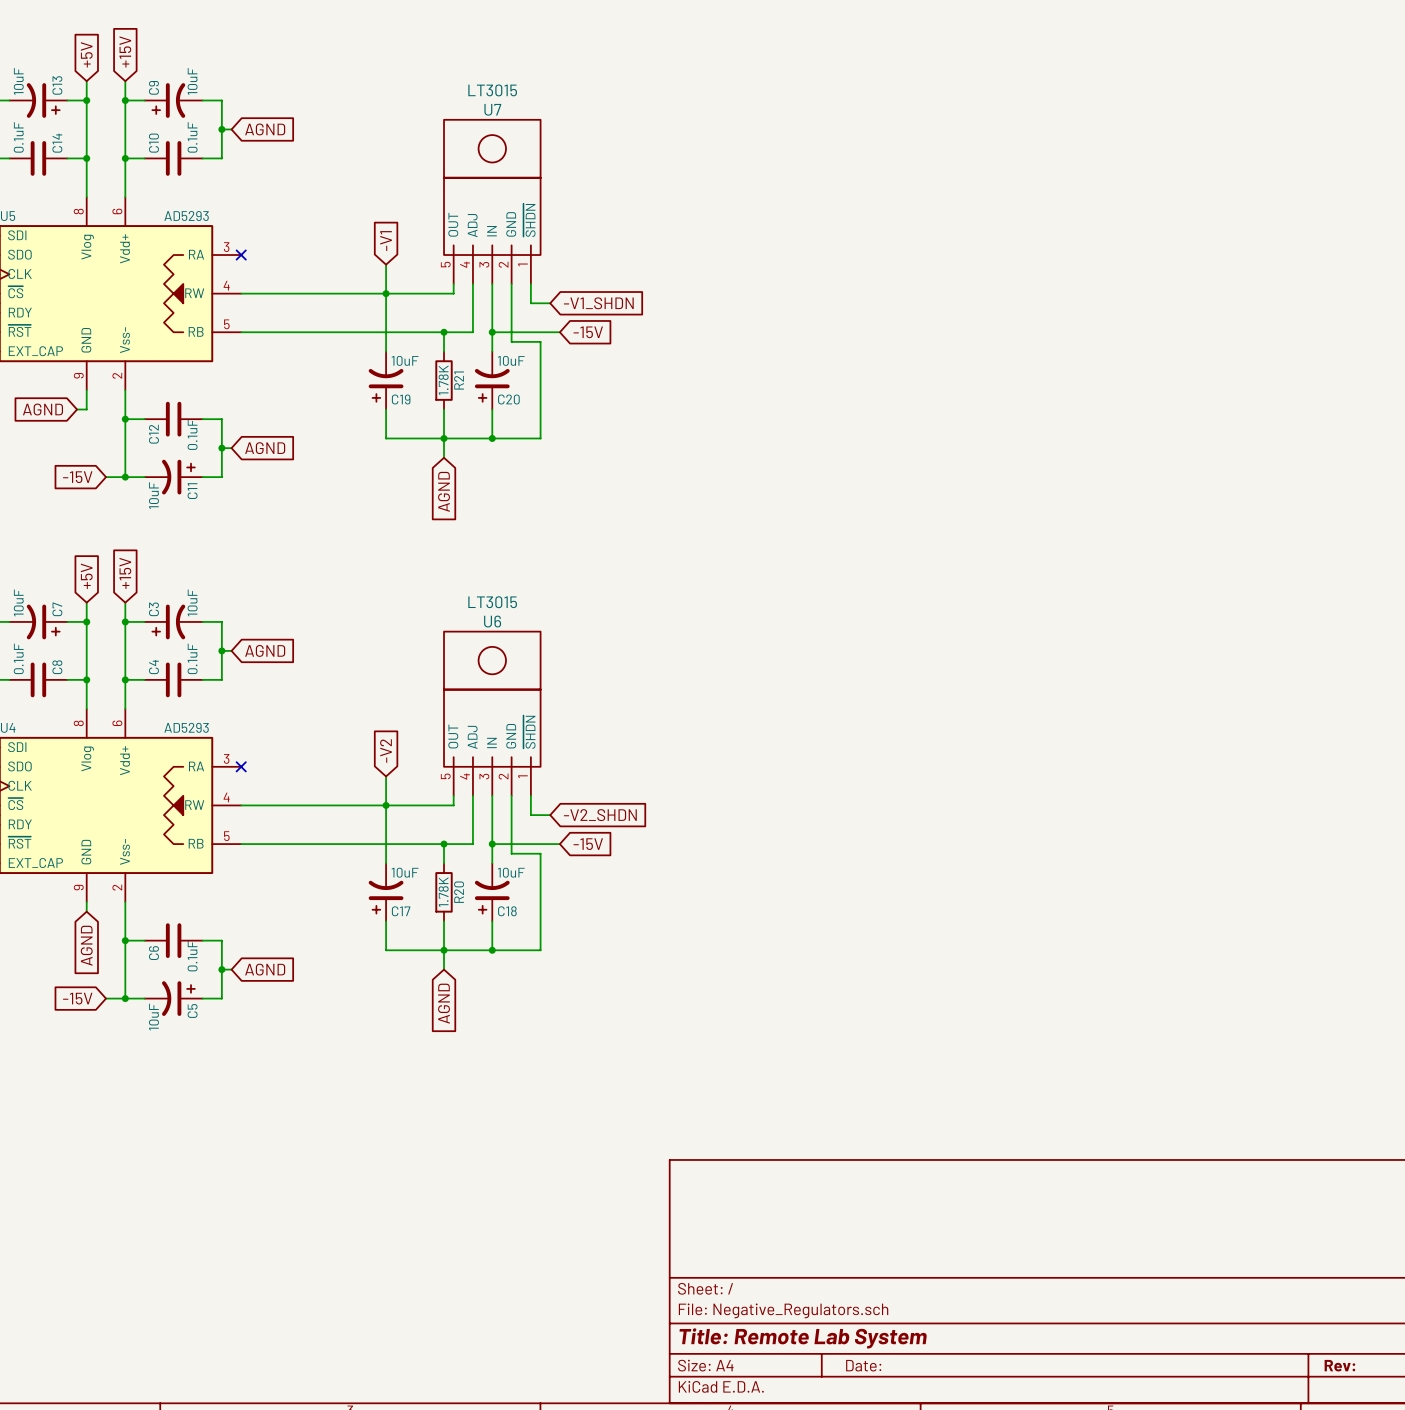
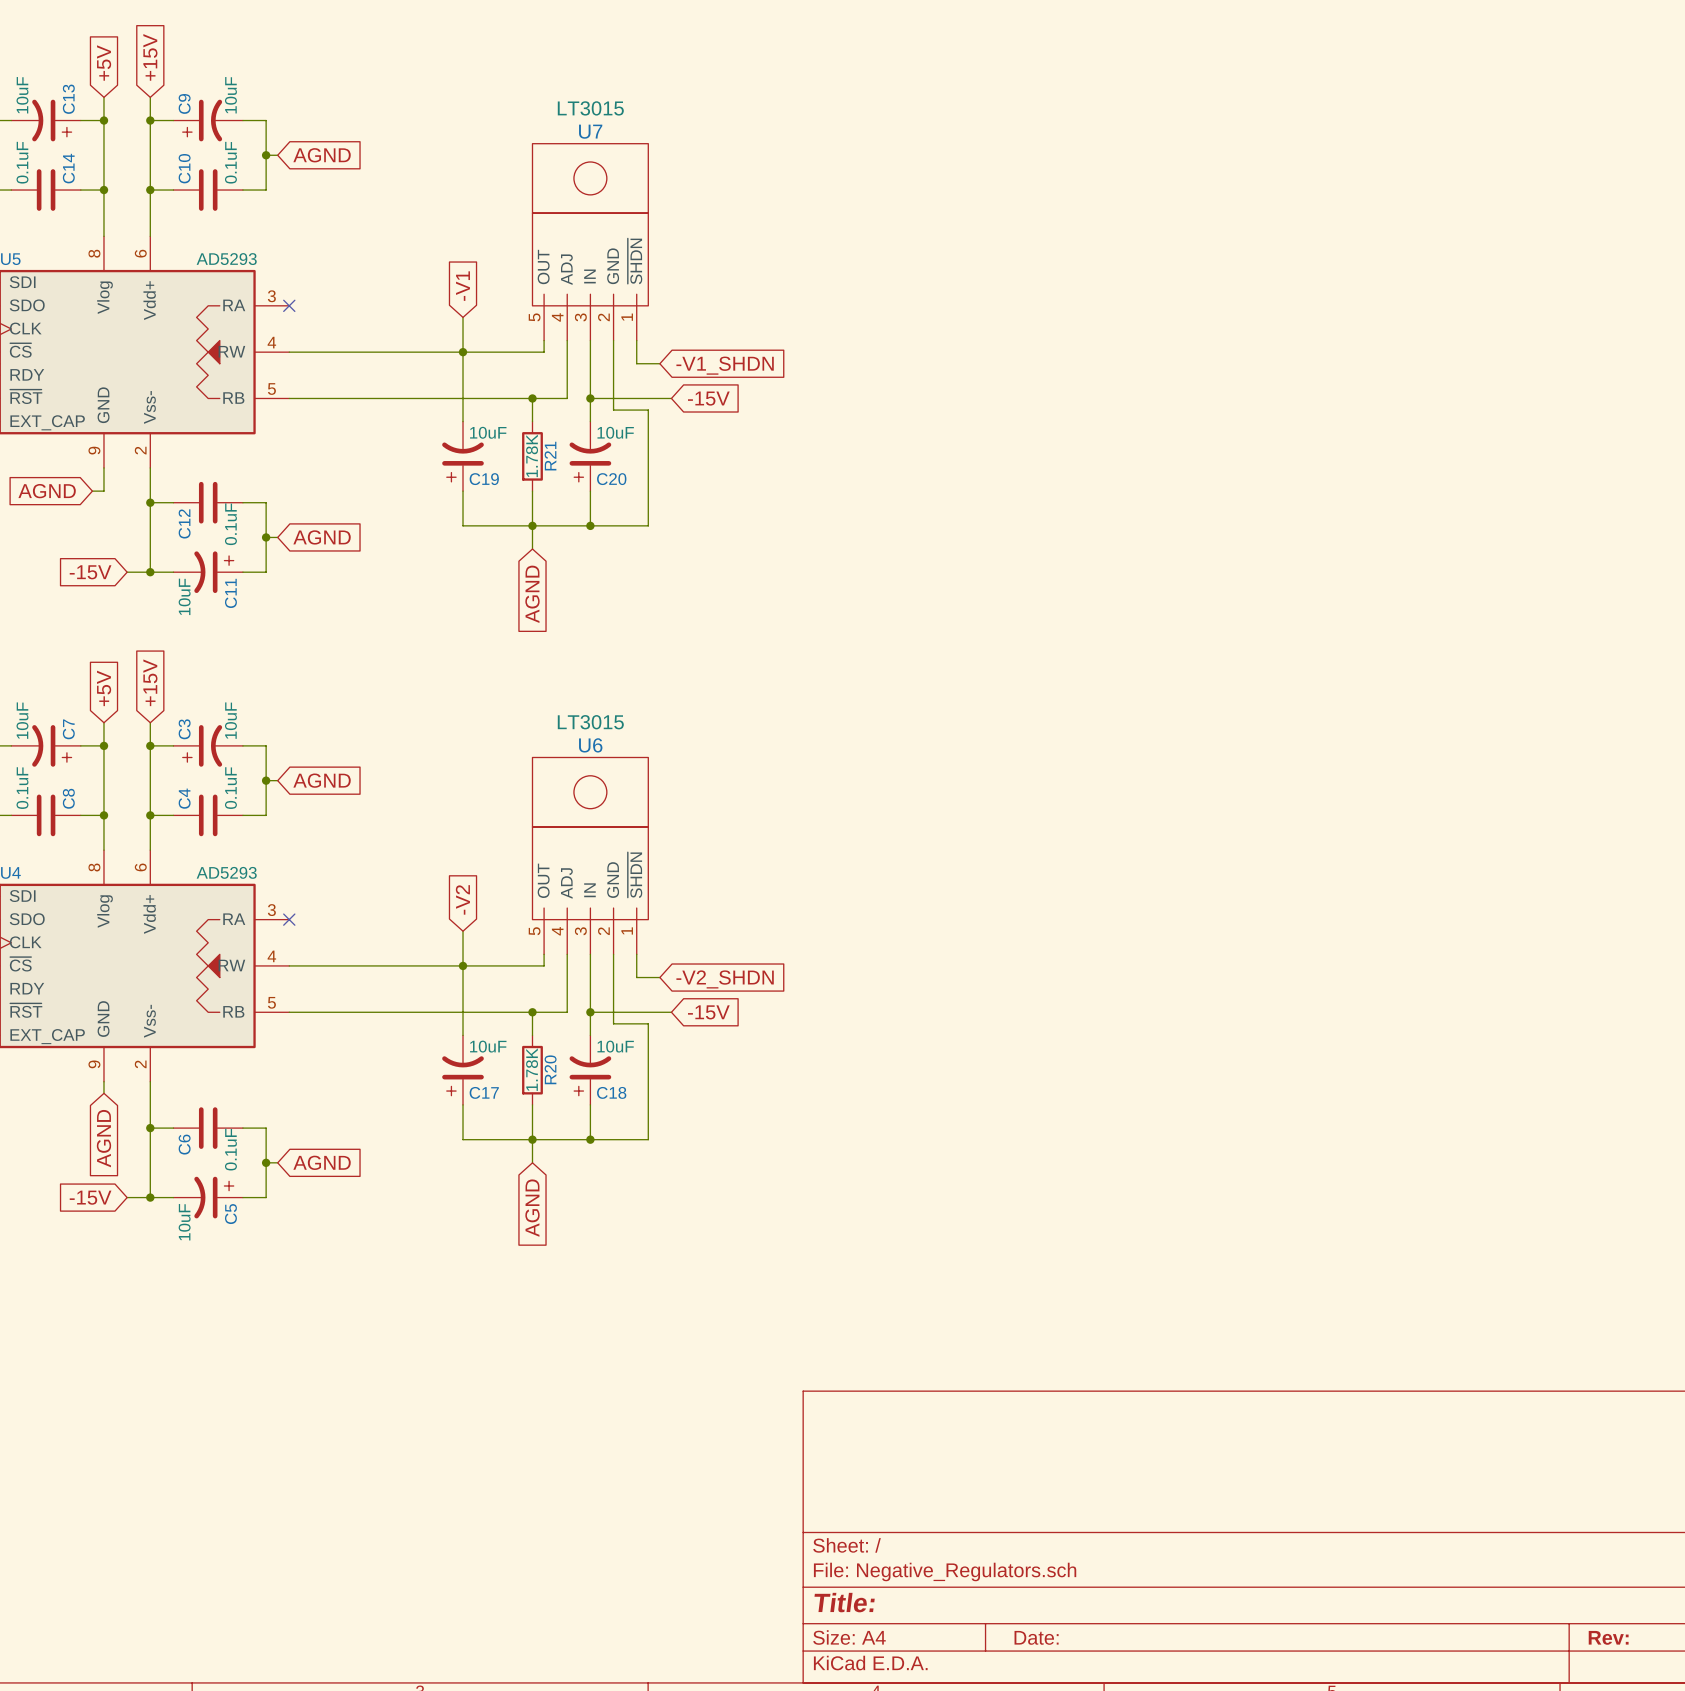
title block: Title: Remote Lab System (803, 1338) -> Title: (844, 1602)

